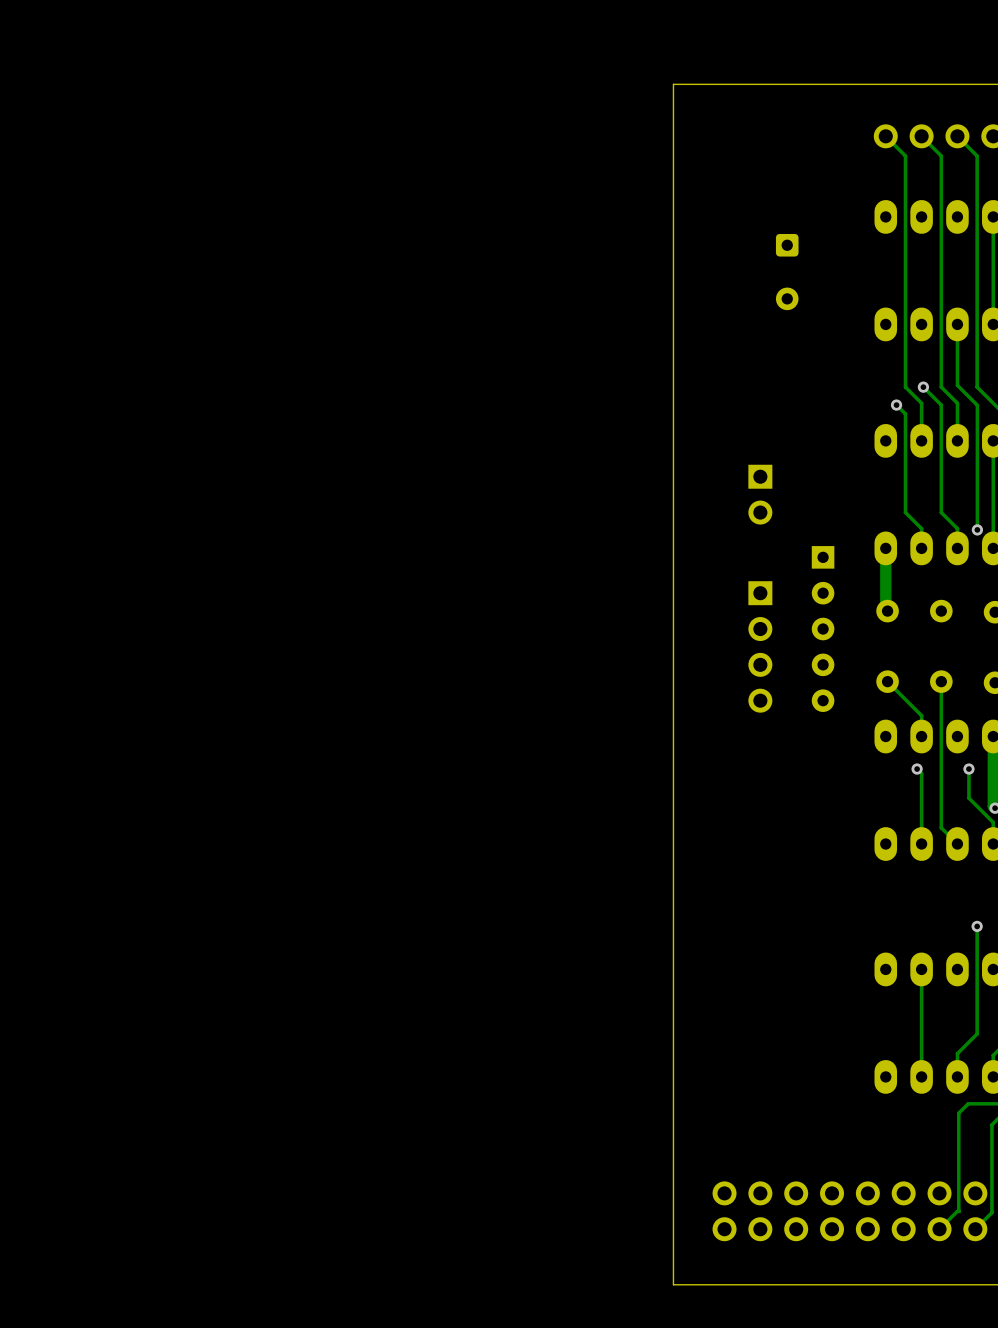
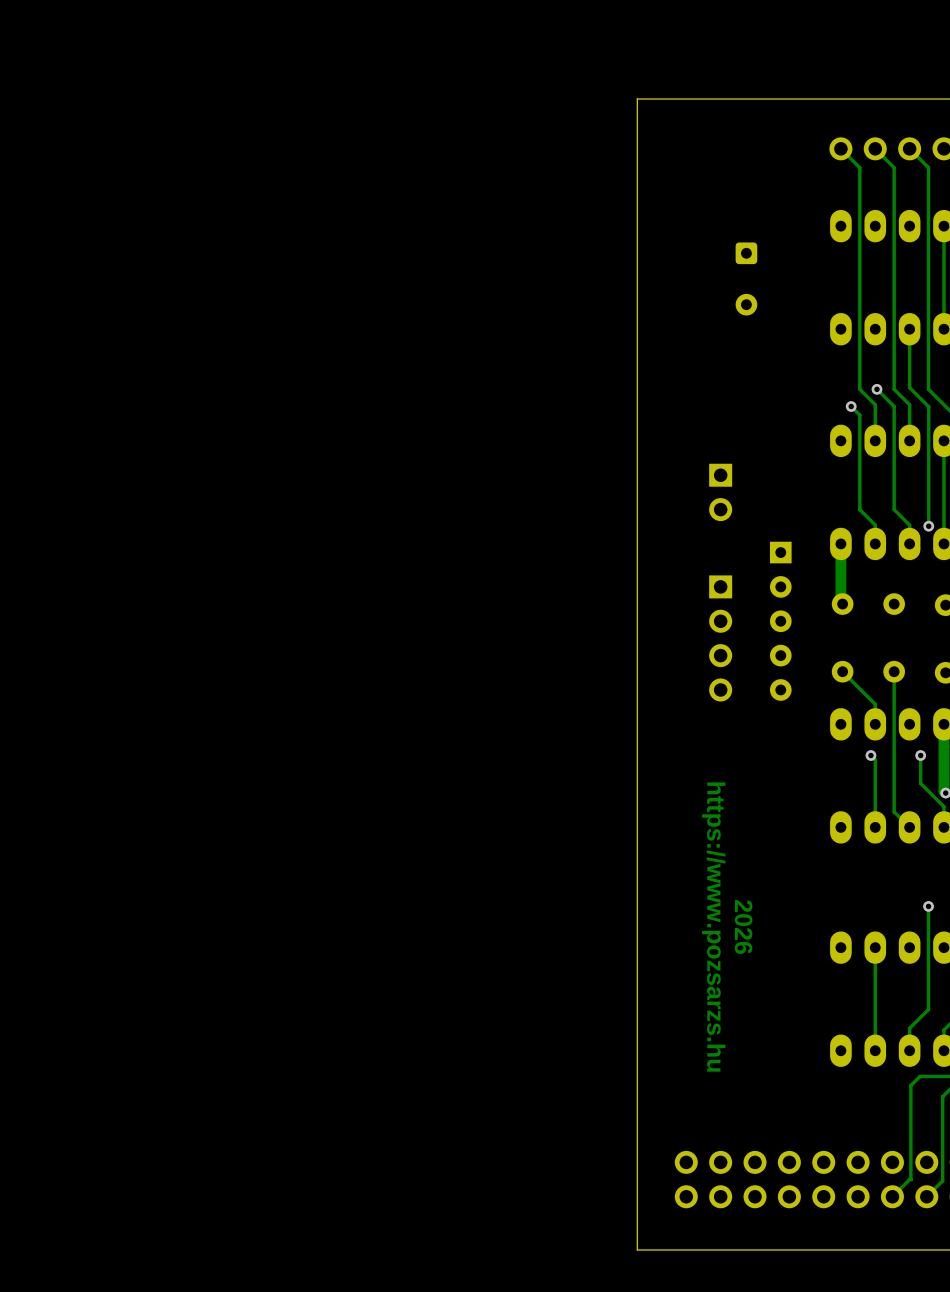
text: none -> https://www.pozsarzs.hu (713, 927)
text: none -> 2026 (743, 927)

